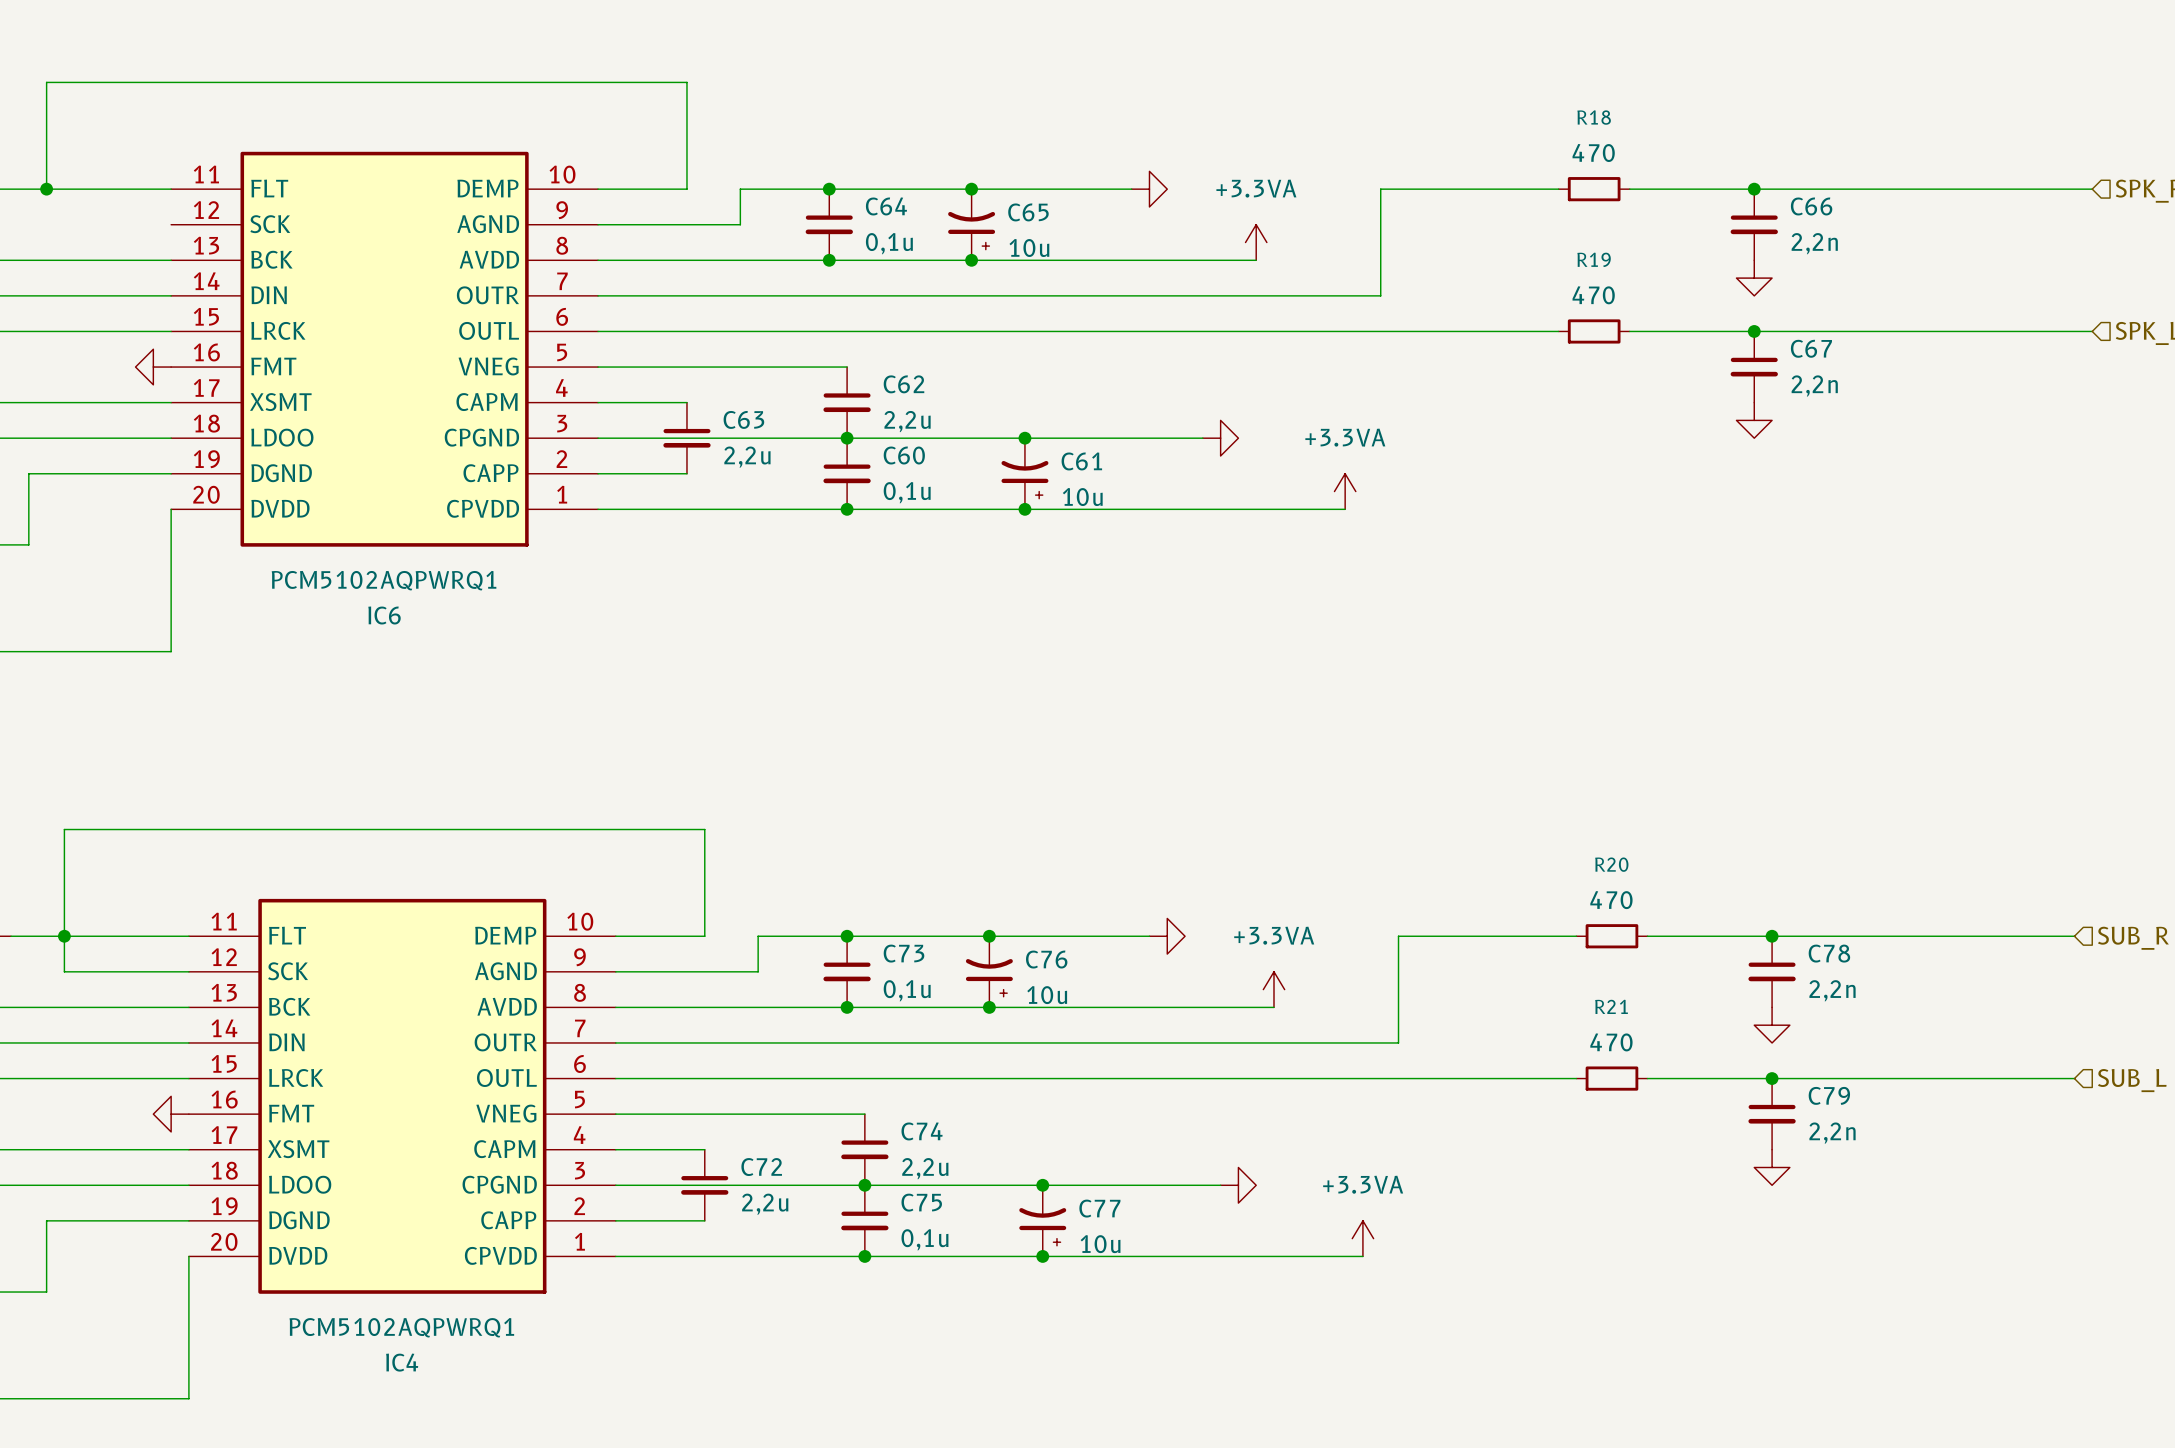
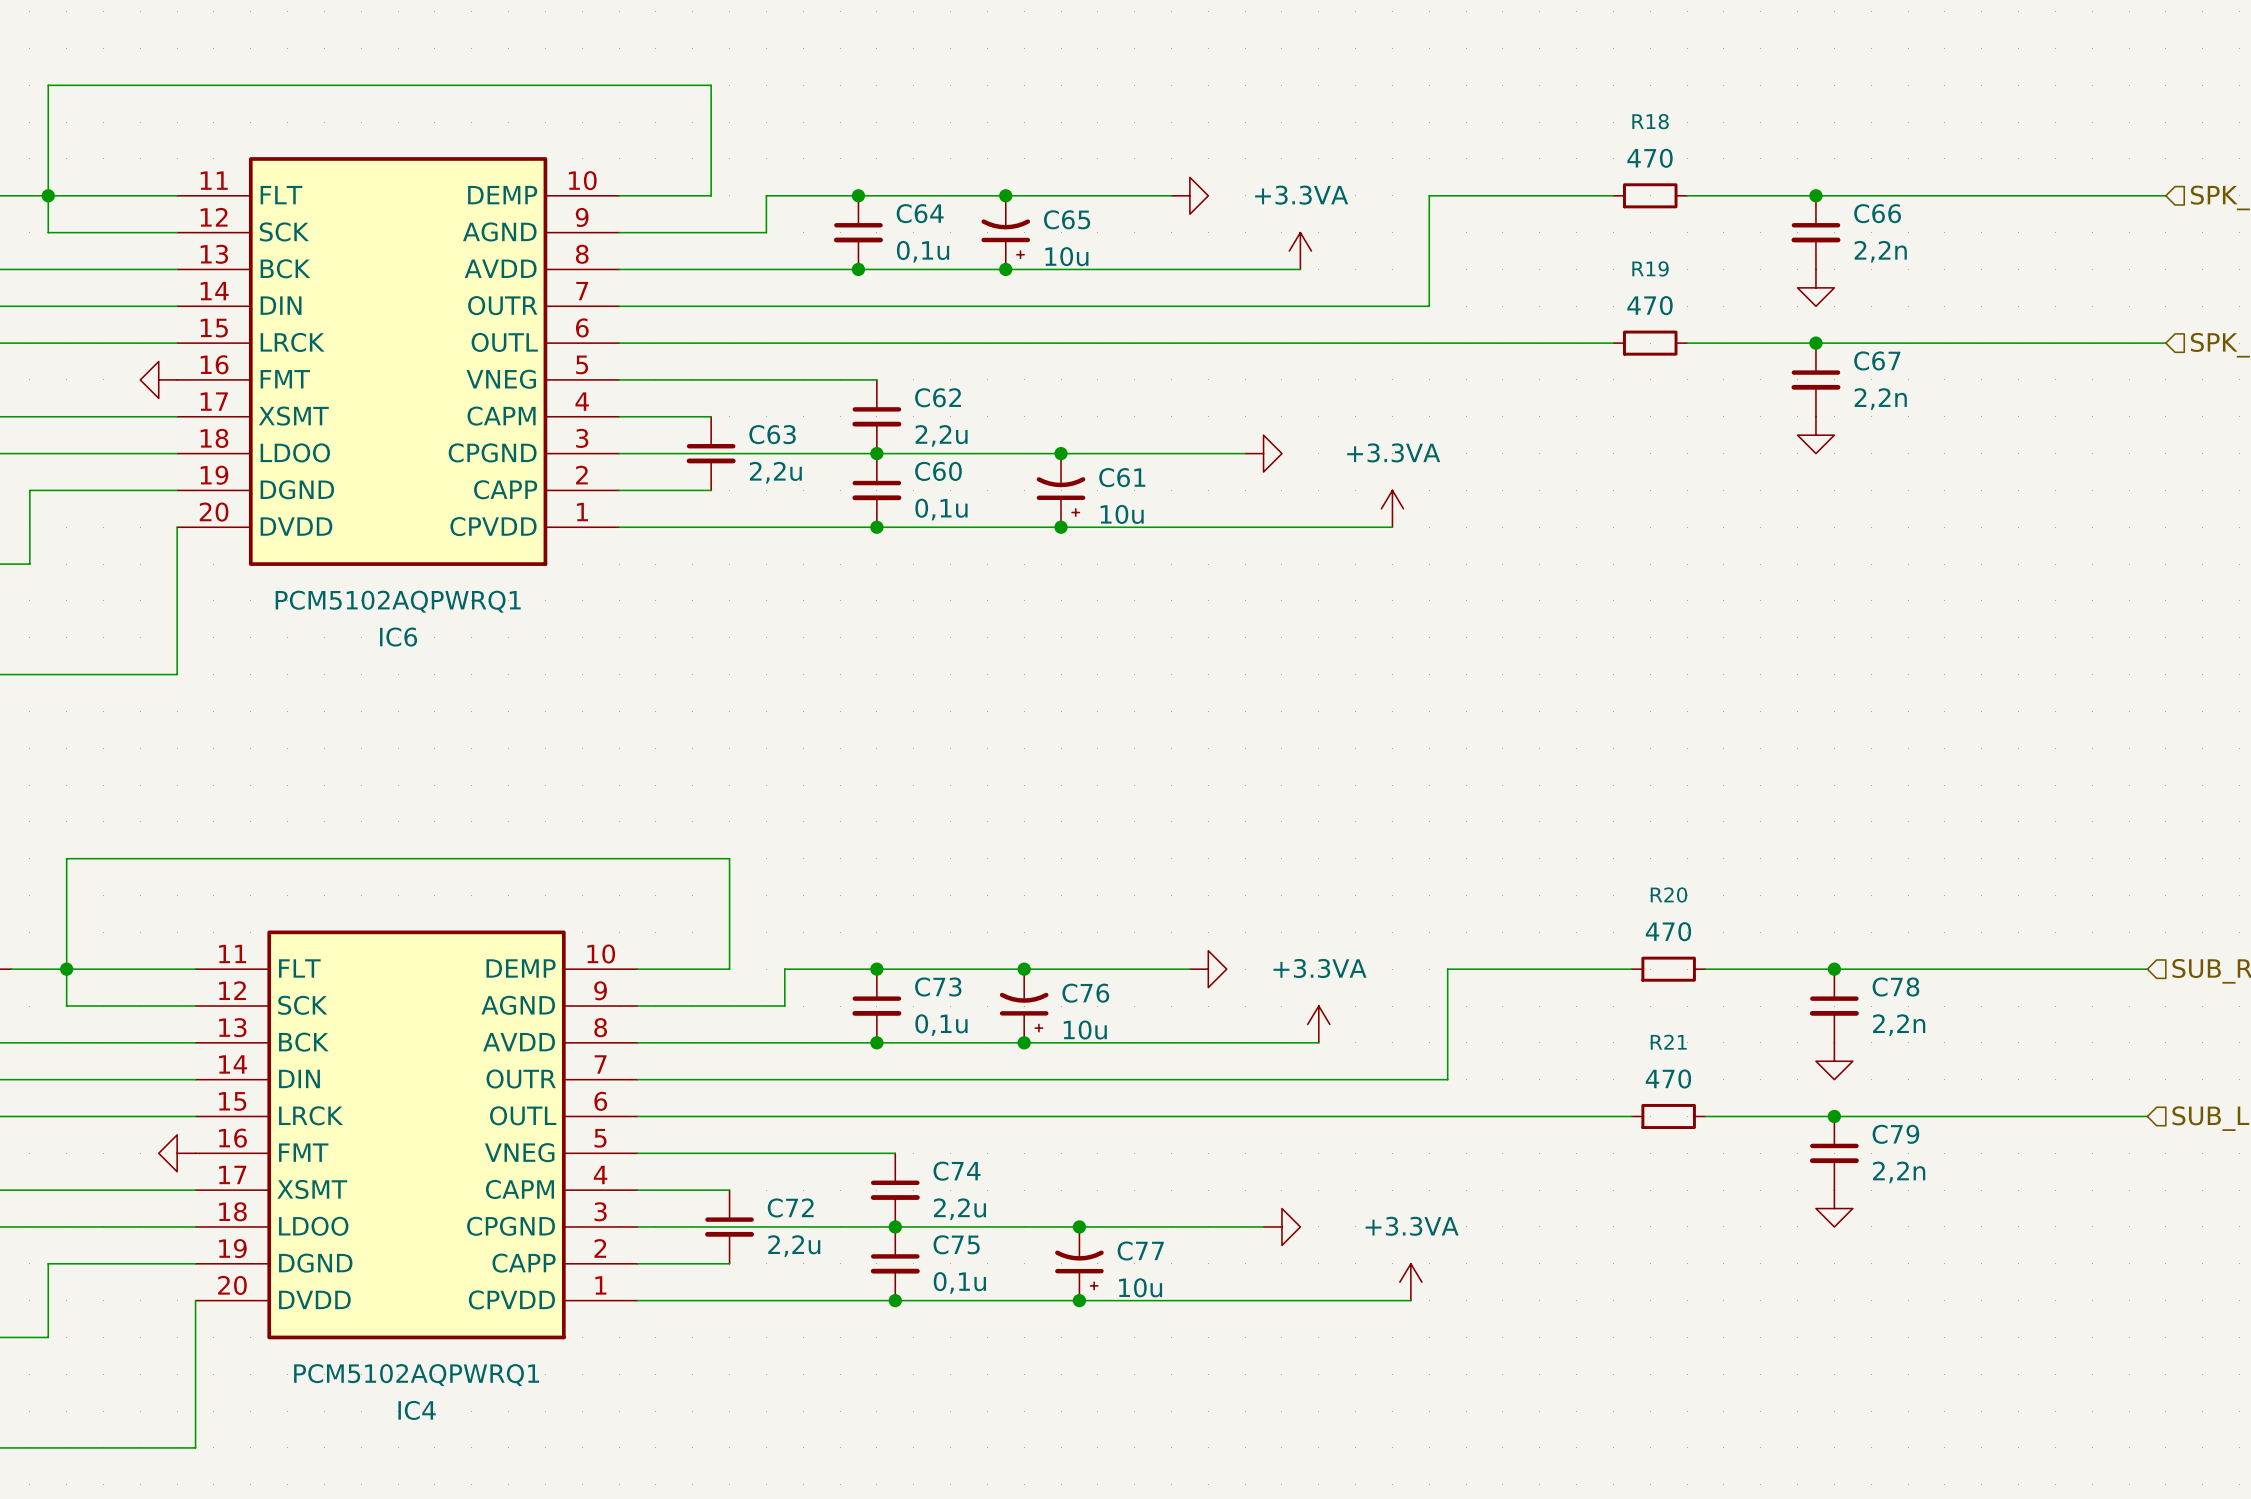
wire: none -> (48, 195) (48, 232) (177, 232)

